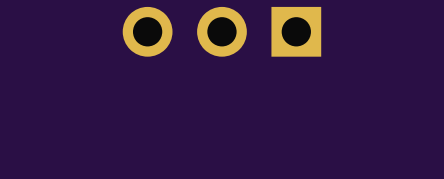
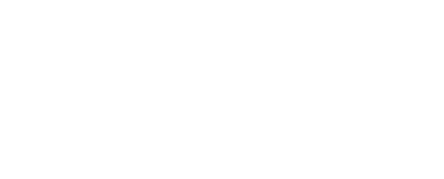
part: (221, 31) -> none

